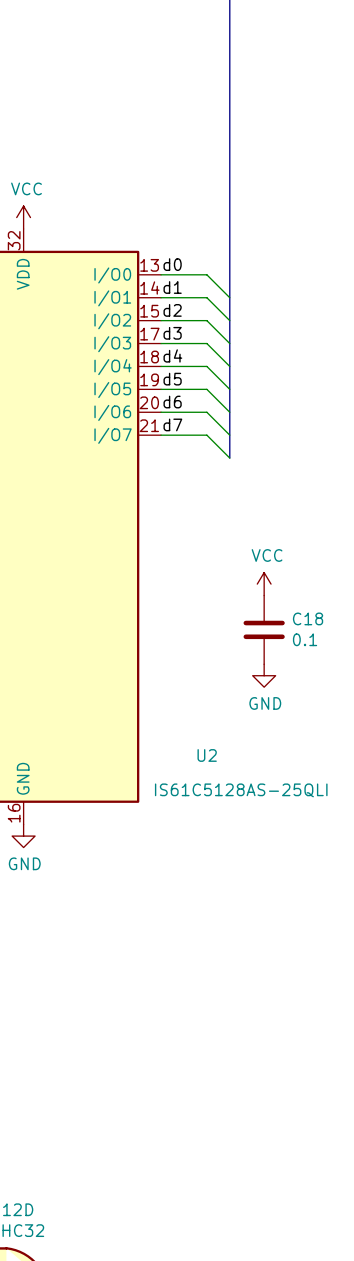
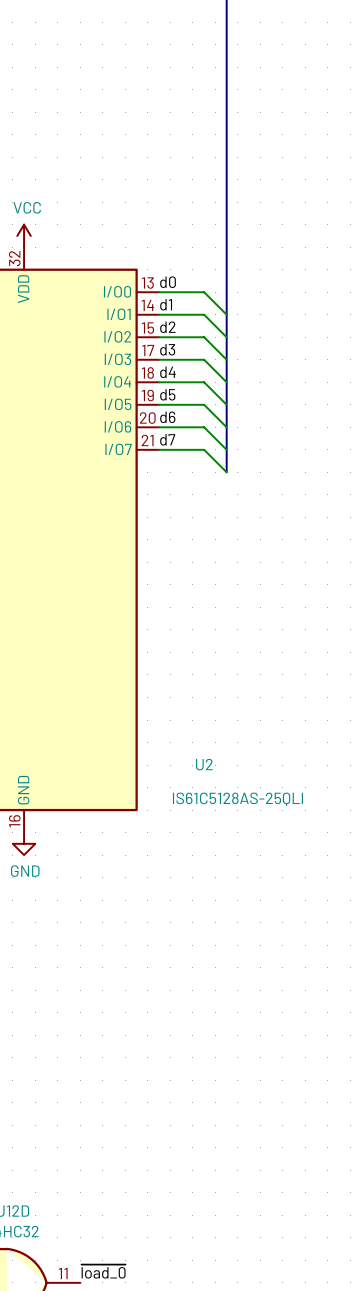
power symbol: VCC (264, 584) -> none
C18: 0.1 (264, 629) -> none
power symbol: GND (264, 675) -> none

